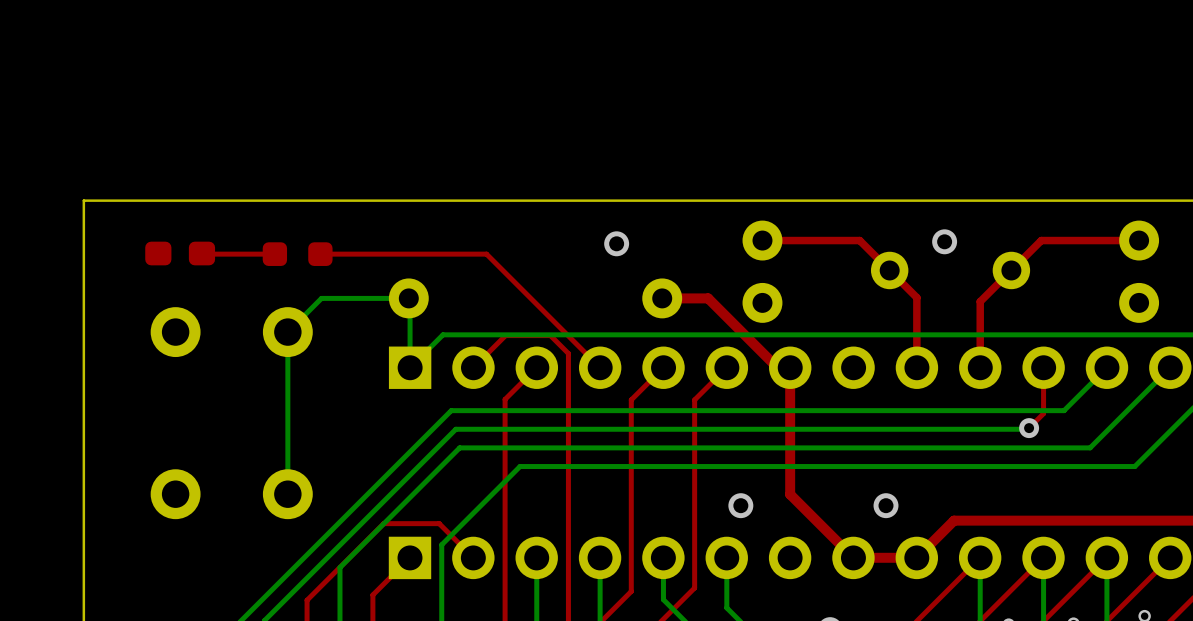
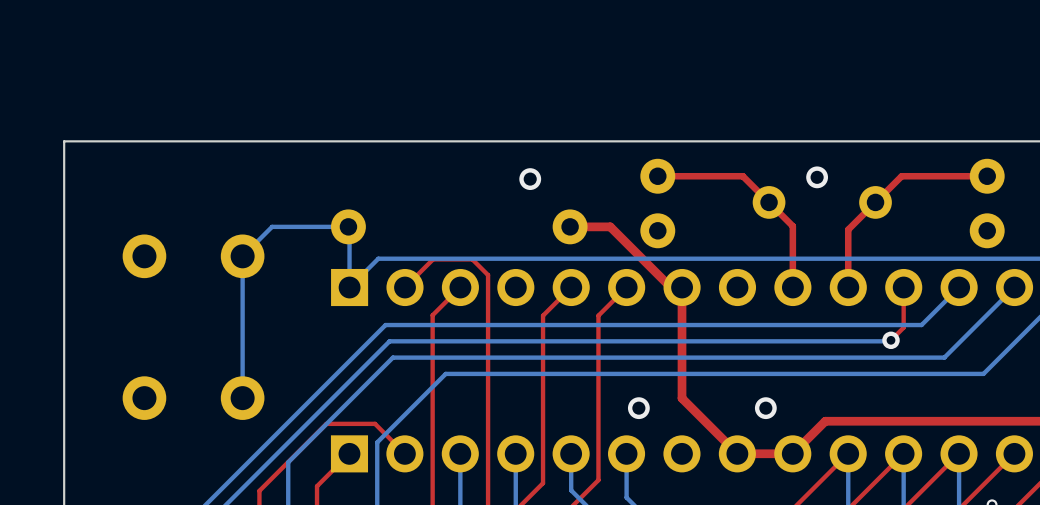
part: (180, 253) -> none
top track: (201, 253) (274, 254) -> none
part: (297, 254) -> none
top track: (320, 254) (486, 254) (600, 367) -> none

